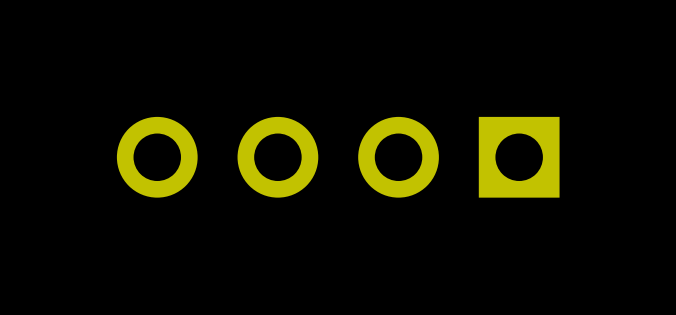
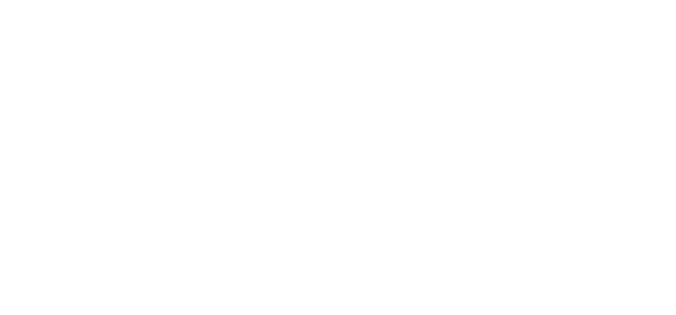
part: (338, 157) -> none

